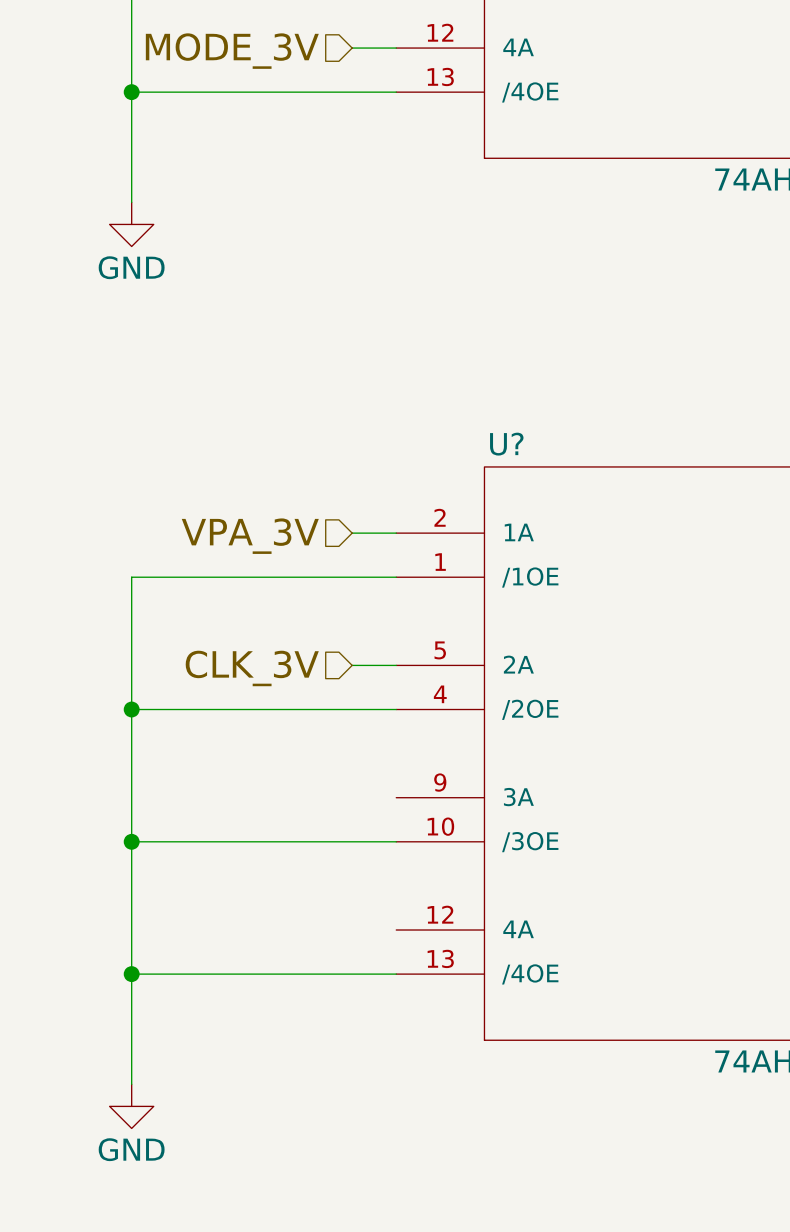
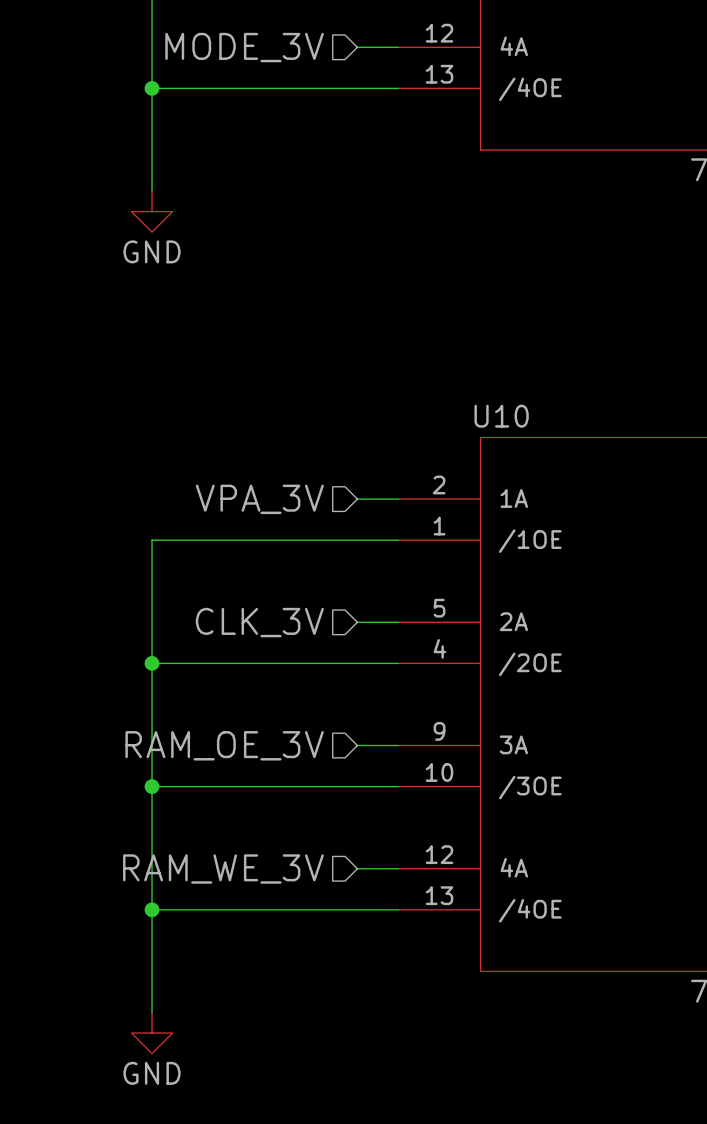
U? name: U? (506, 444) -> U10 (501, 416)
wire: none -> (357, 745) (398, 745)
hierarchical label: none -> RAM_OE_3V (224, 745)
wire: none -> (357, 868) (398, 868)
hierarchical label: none -> RAM_WE_3V (223, 869)

